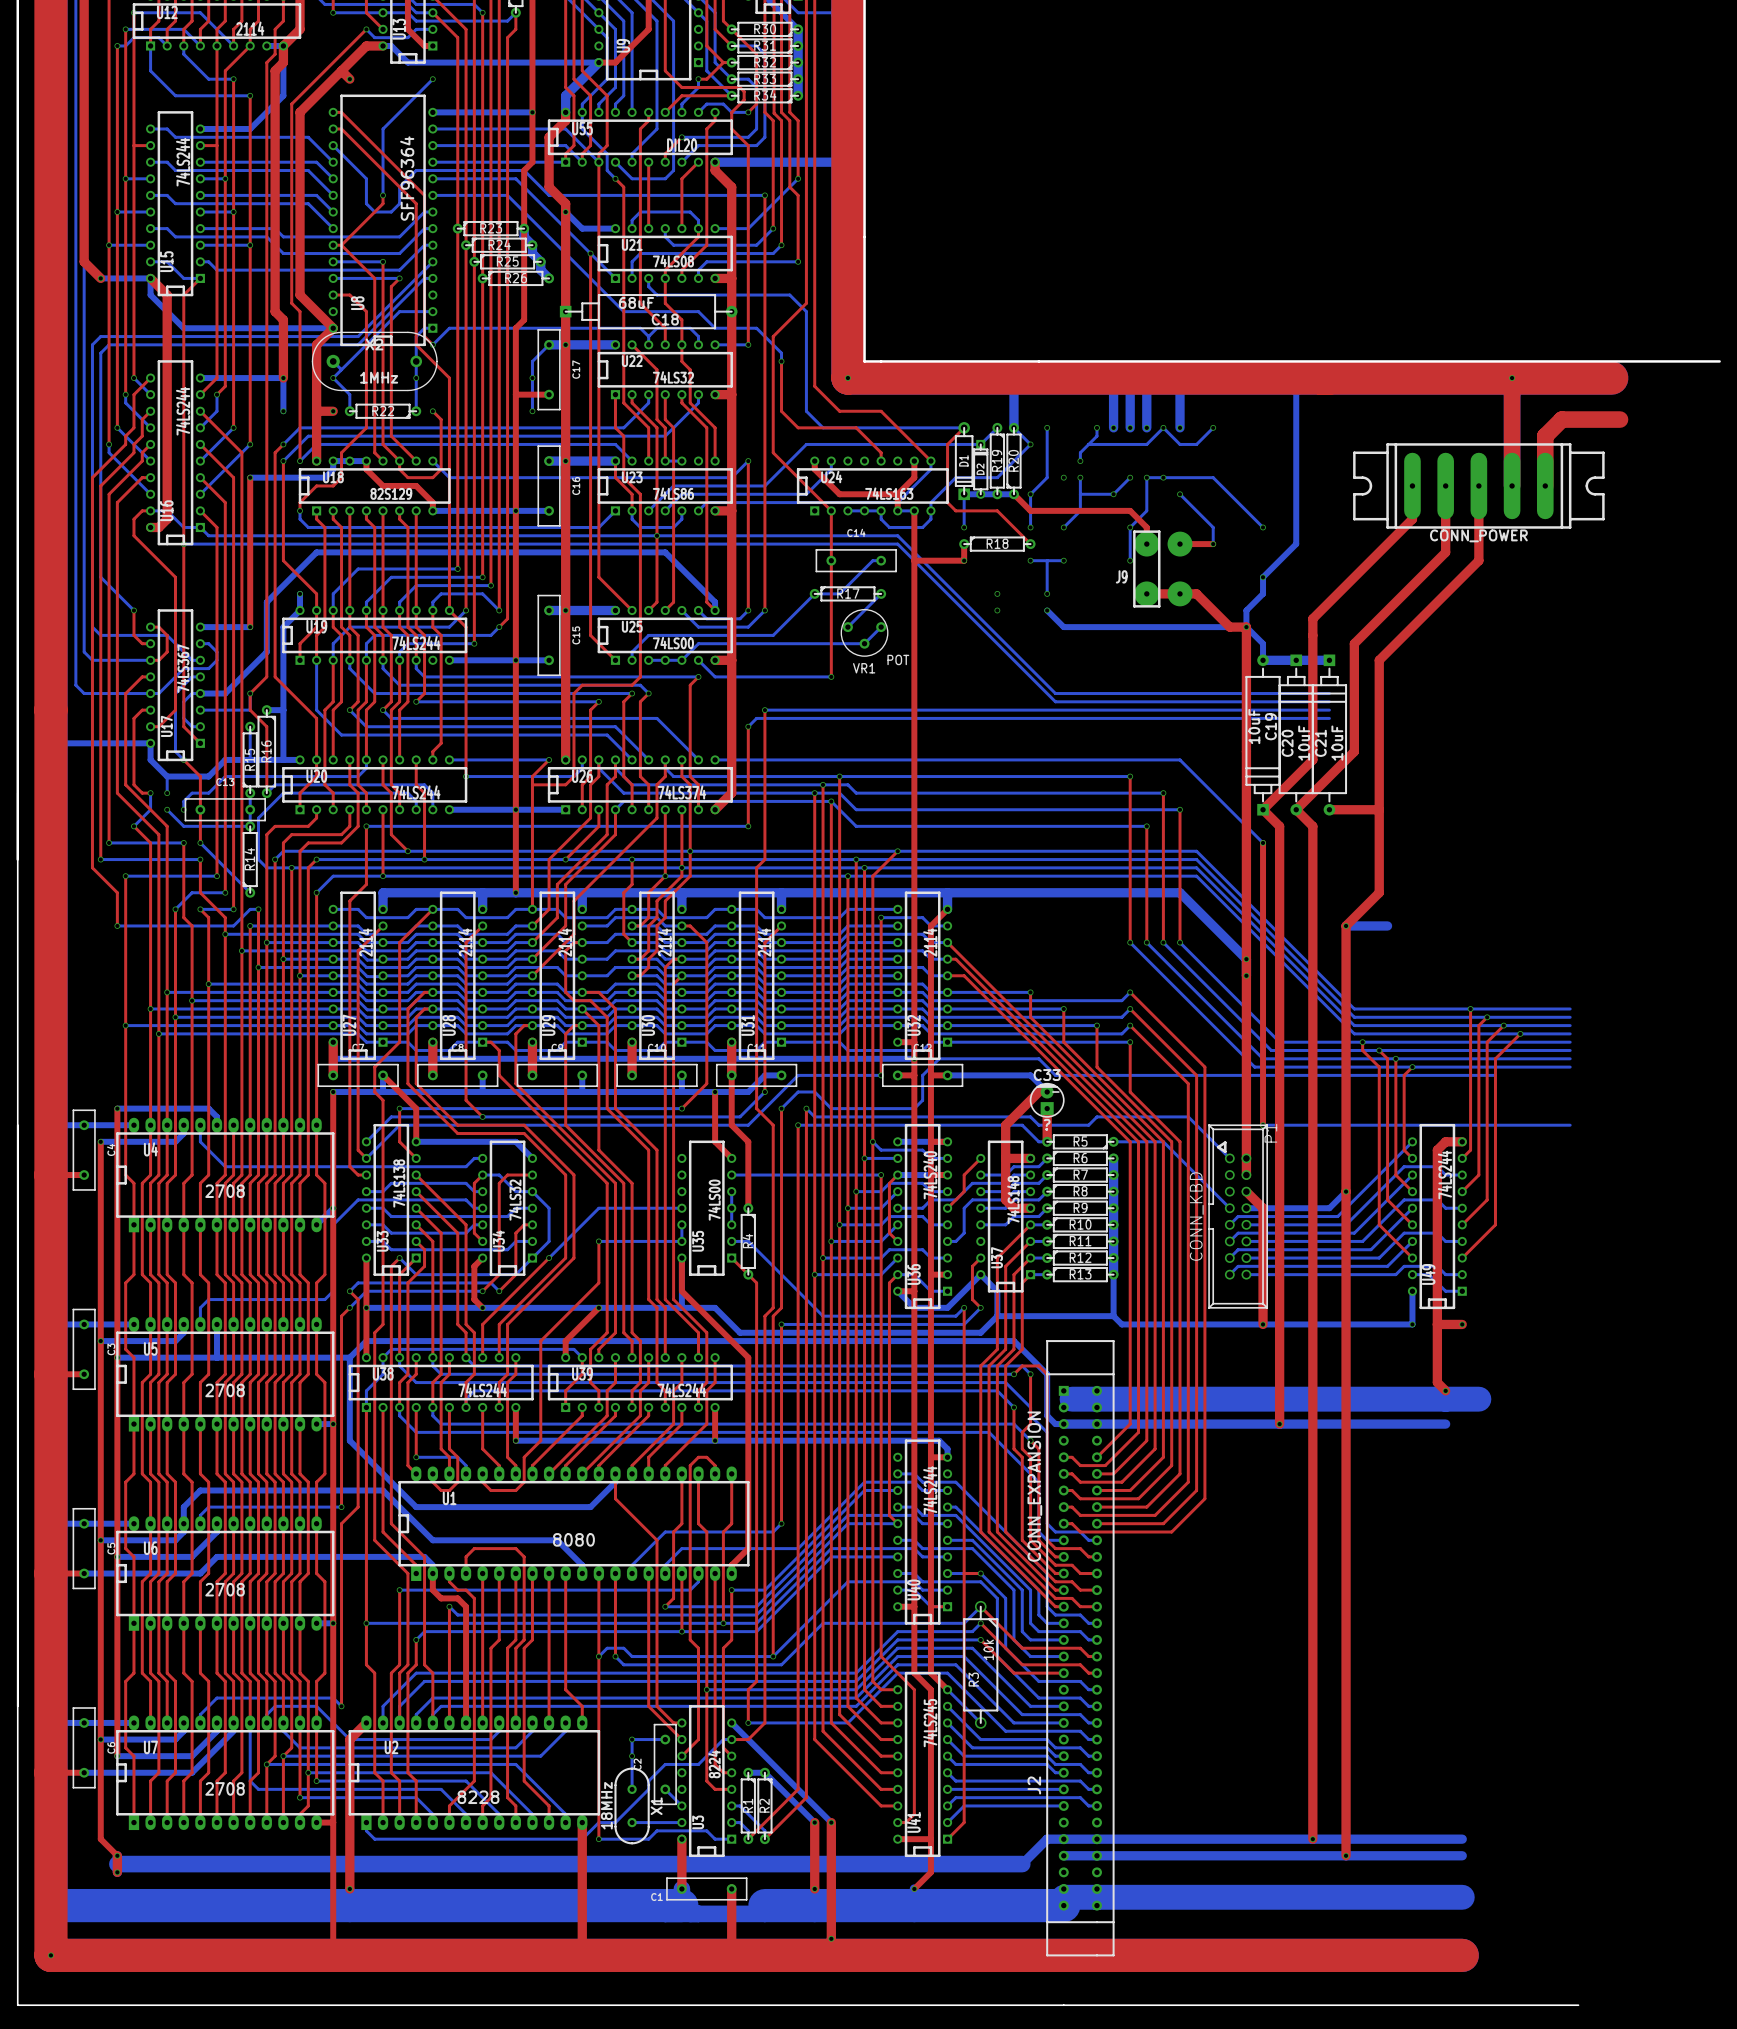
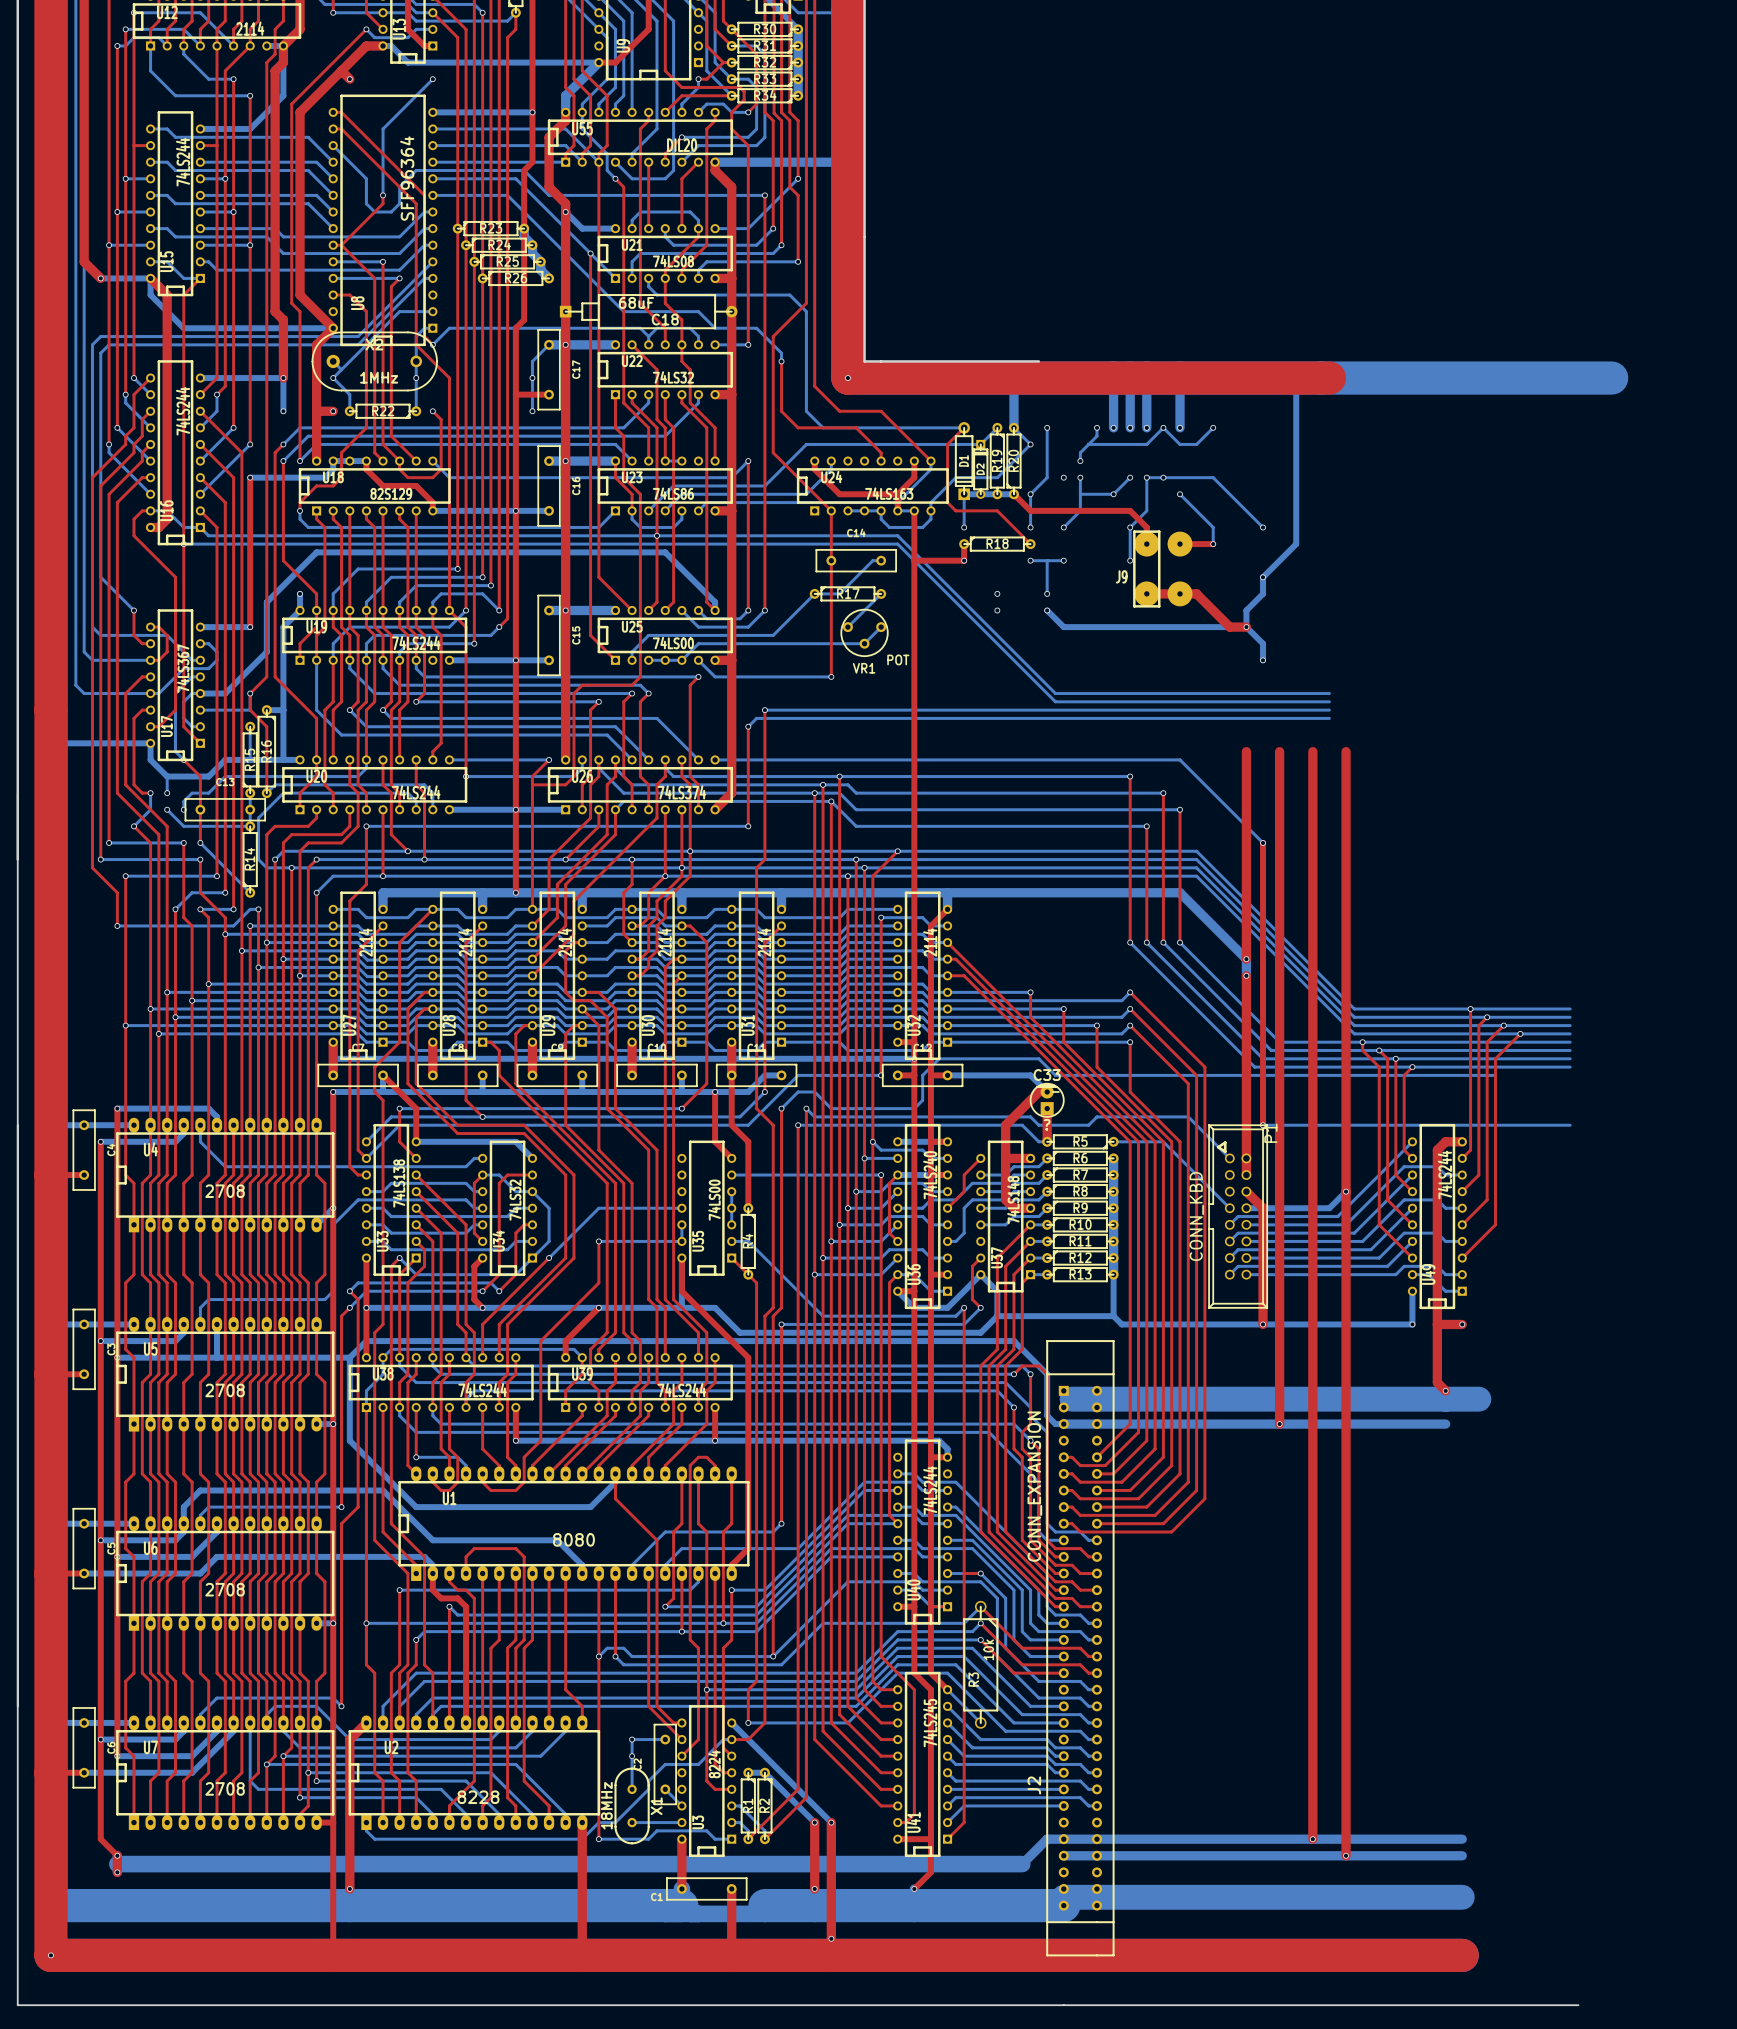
board edge: (1038, 361) (1719, 361) -> none
top track: (1329, 378) (1611, 378) -> none
top track: (1512, 378) (1512, 485) -> none
via: (1512, 378) -> none
top track: (1620, 419) (1561, 419) (1545, 436) (1545, 485) -> none
top track: (1412, 485) (1412, 519) (1312, 618) (1312, 751) -> none
top track: (1445, 485) (1445, 552) (1354, 643) (1354, 751) (1296, 809) (1312, 826) -> none
top track: (1478, 485) (1478, 560) (1379, 660) (1379, 892) (1346, 925) -> (1346, 751) (1346, 925)
part: CONN_POWER (1478, 485) -> none
top track: (1246, 627) (1246, 751) -> none
bottom track: (1263, 660) (1329, 660) -> none
via: none -> (1263, 660)
C19: 10uF (1263, 735) -> none
C20: 10uF (1296, 735) -> none
C21: 10uF (1329, 735) -> none
top track: none -> (1279, 751) (1279, 826)
top track: (1312, 759) (1263, 809) (1279, 826) -> (1312, 759) (1312, 826)
top track: (1329, 809) (1379, 809) -> none
bottom track: (1346, 925) (1387, 925) -> none
via: (1346, 925) -> none
top track: (1246, 959) (1246, 975) -> none

